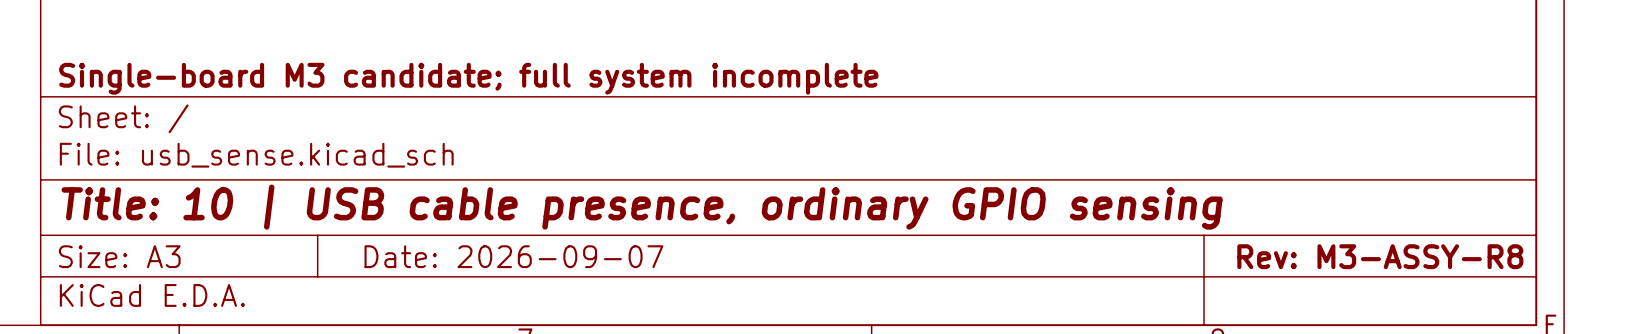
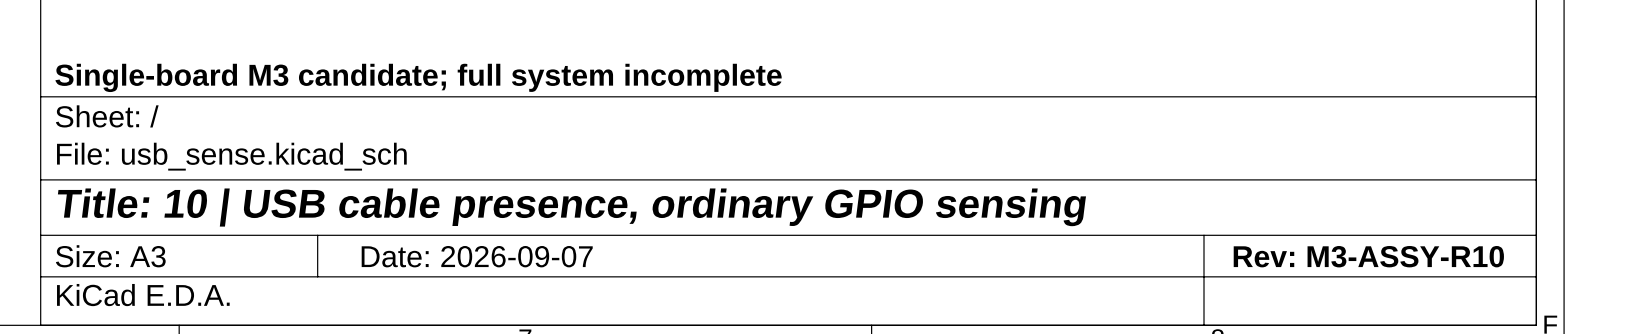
title block: Rev: M3-ASSY-R8 (1380, 256) -> Rev: M3-ASSY-R10 (1368, 256)

